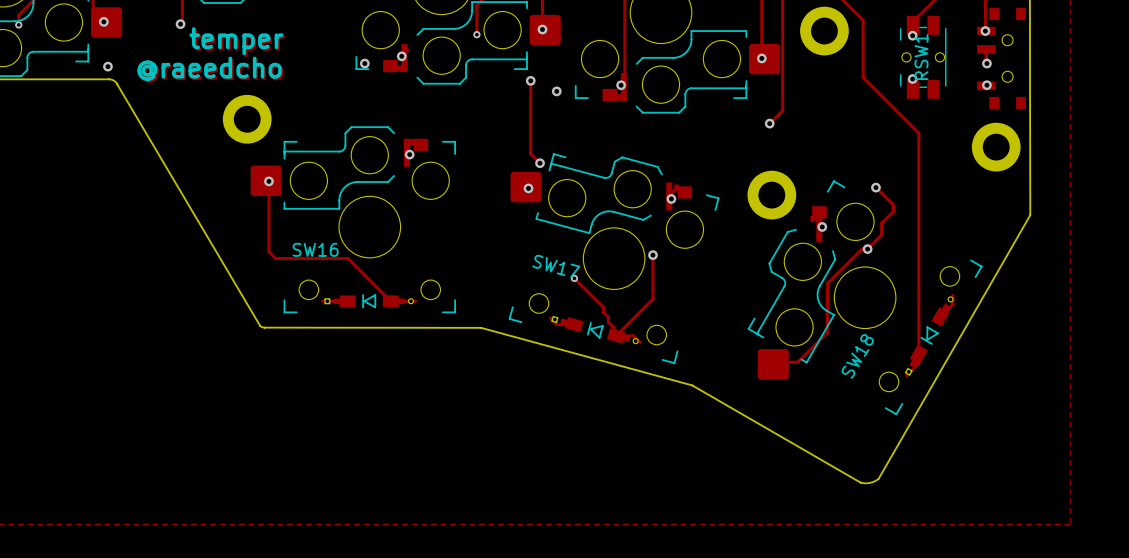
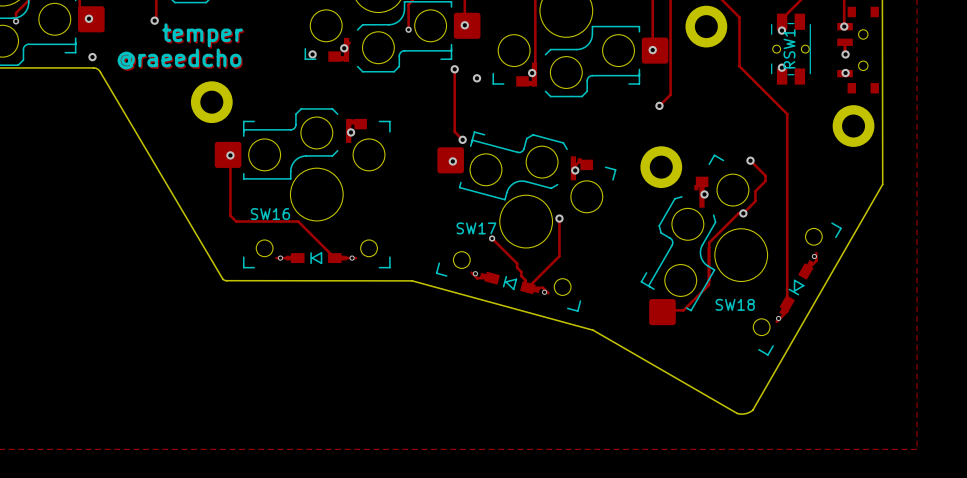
SW17 name rotation: 0° (556, 266) -> 15° counterclockwise (476, 228)
part footprint: [324, 294, 415, 309] -> [285, 252, 347, 265]
part footprint: [904, 296, 954, 376] -> [779, 260, 814, 315]
via: none -> (814, 256)
via: none -> (280, 258)
via: none -> (352, 258)
part footprint: [551, 315, 639, 345] -> [480, 271, 540, 295]
via: none -> (475, 273)
via: none -> (544, 292)
SW18 name rotation: 0° (857, 356) -> 60° clockwise (735, 304)
via: none -> (778, 318)

